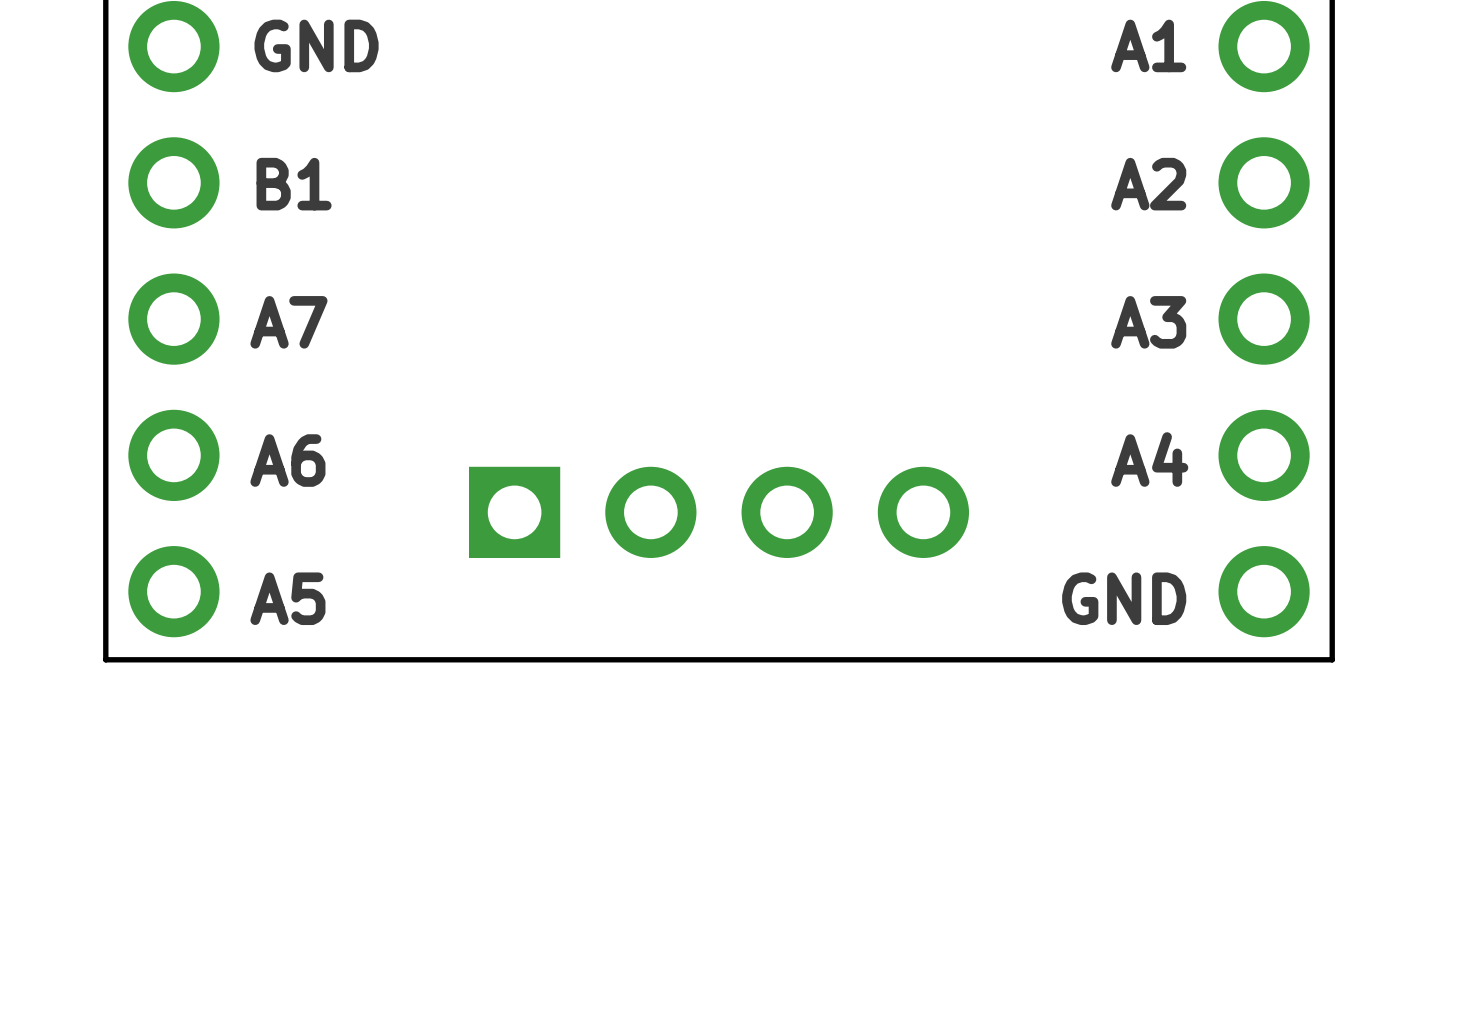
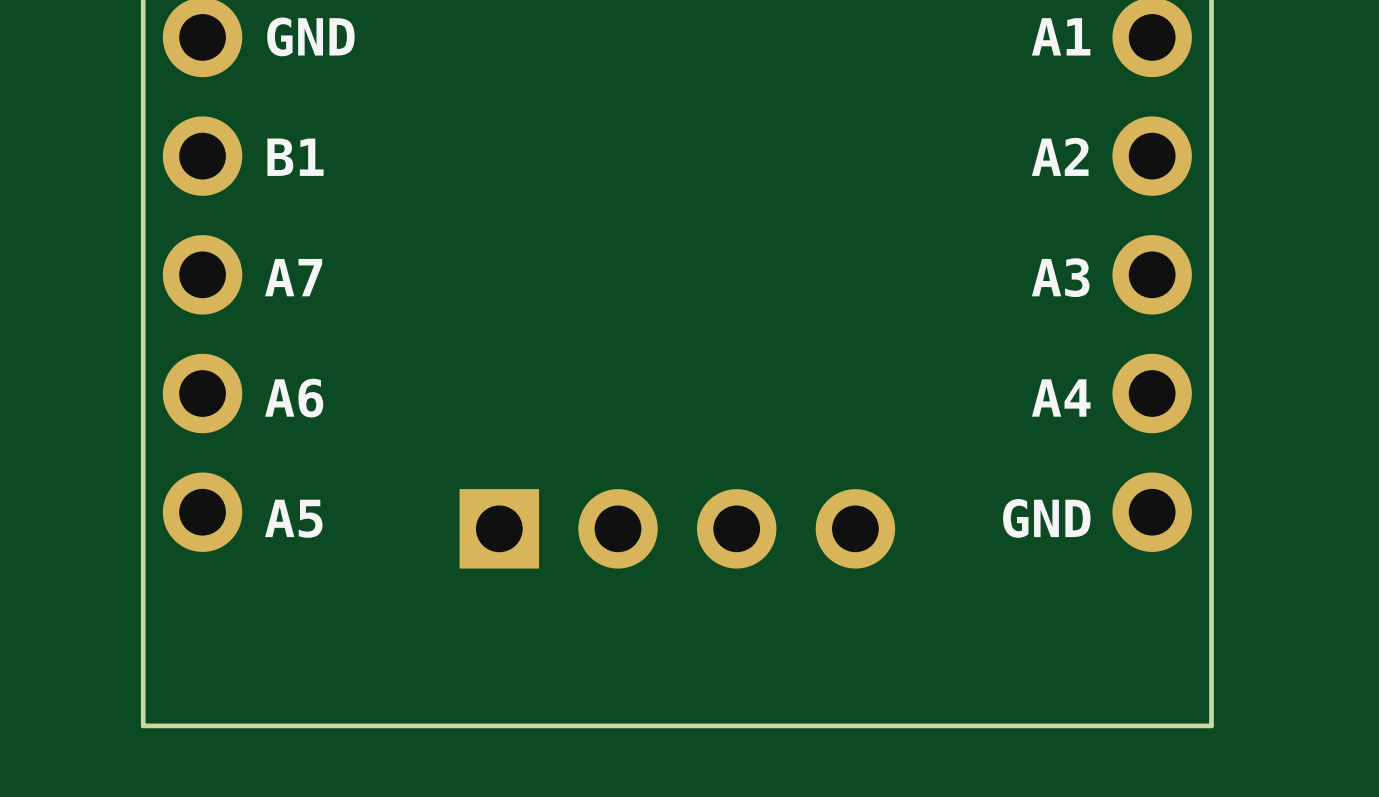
part position: (719, 512) -> (677, 528)
board edge: (1332, 659) (105, 659) -> (1211, 571) (1211, 725) (143, 725) (143, 571)

